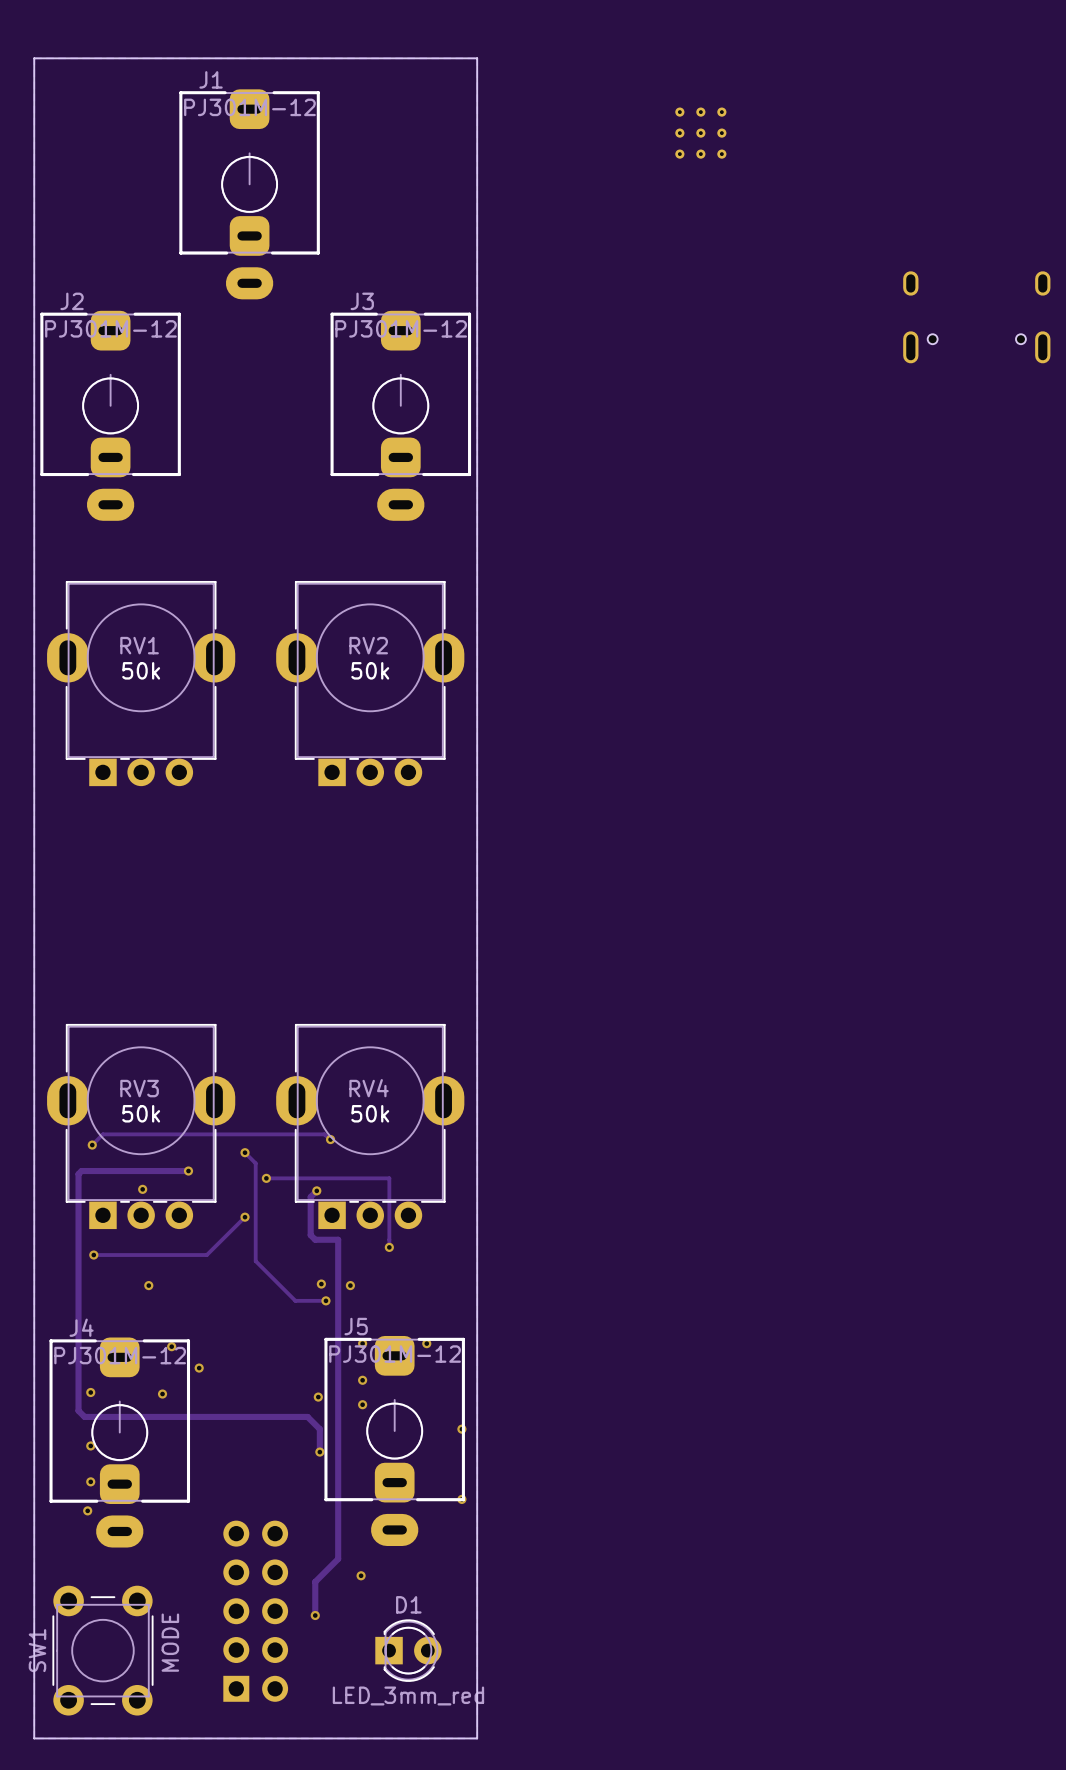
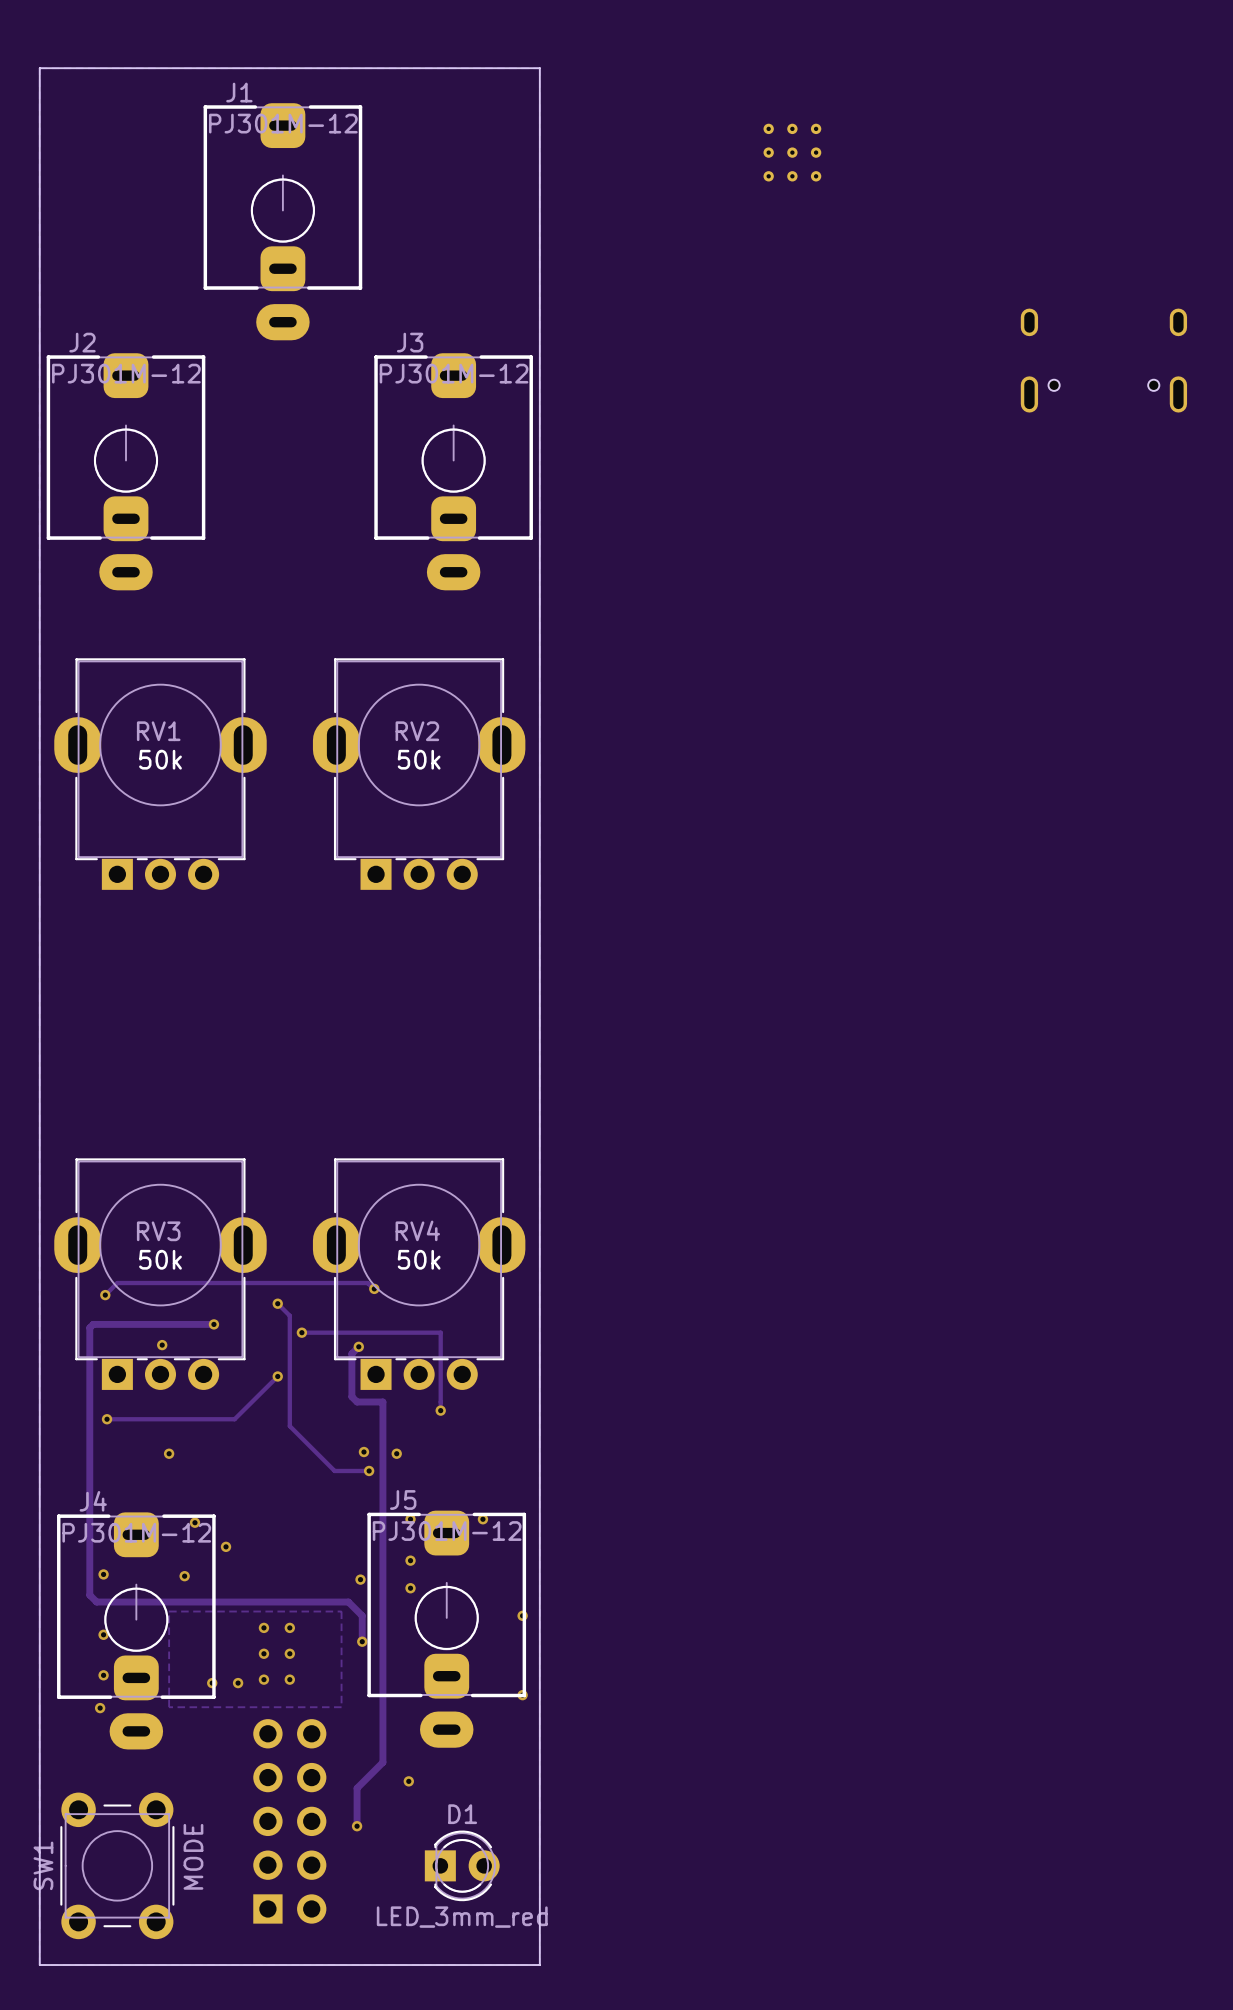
zone outline: none -> (169, 1611) (341, 1611) (341, 1707) (169, 1707) (169, 1611)
via: none -> (263, 1627)
via: none -> (289, 1627)
via: none -> (263, 1653)
via: none -> (289, 1653)
via: none -> (263, 1679)
via: none -> (289, 1679)
via: none -> (212, 1683)
via: none -> (238, 1683)

